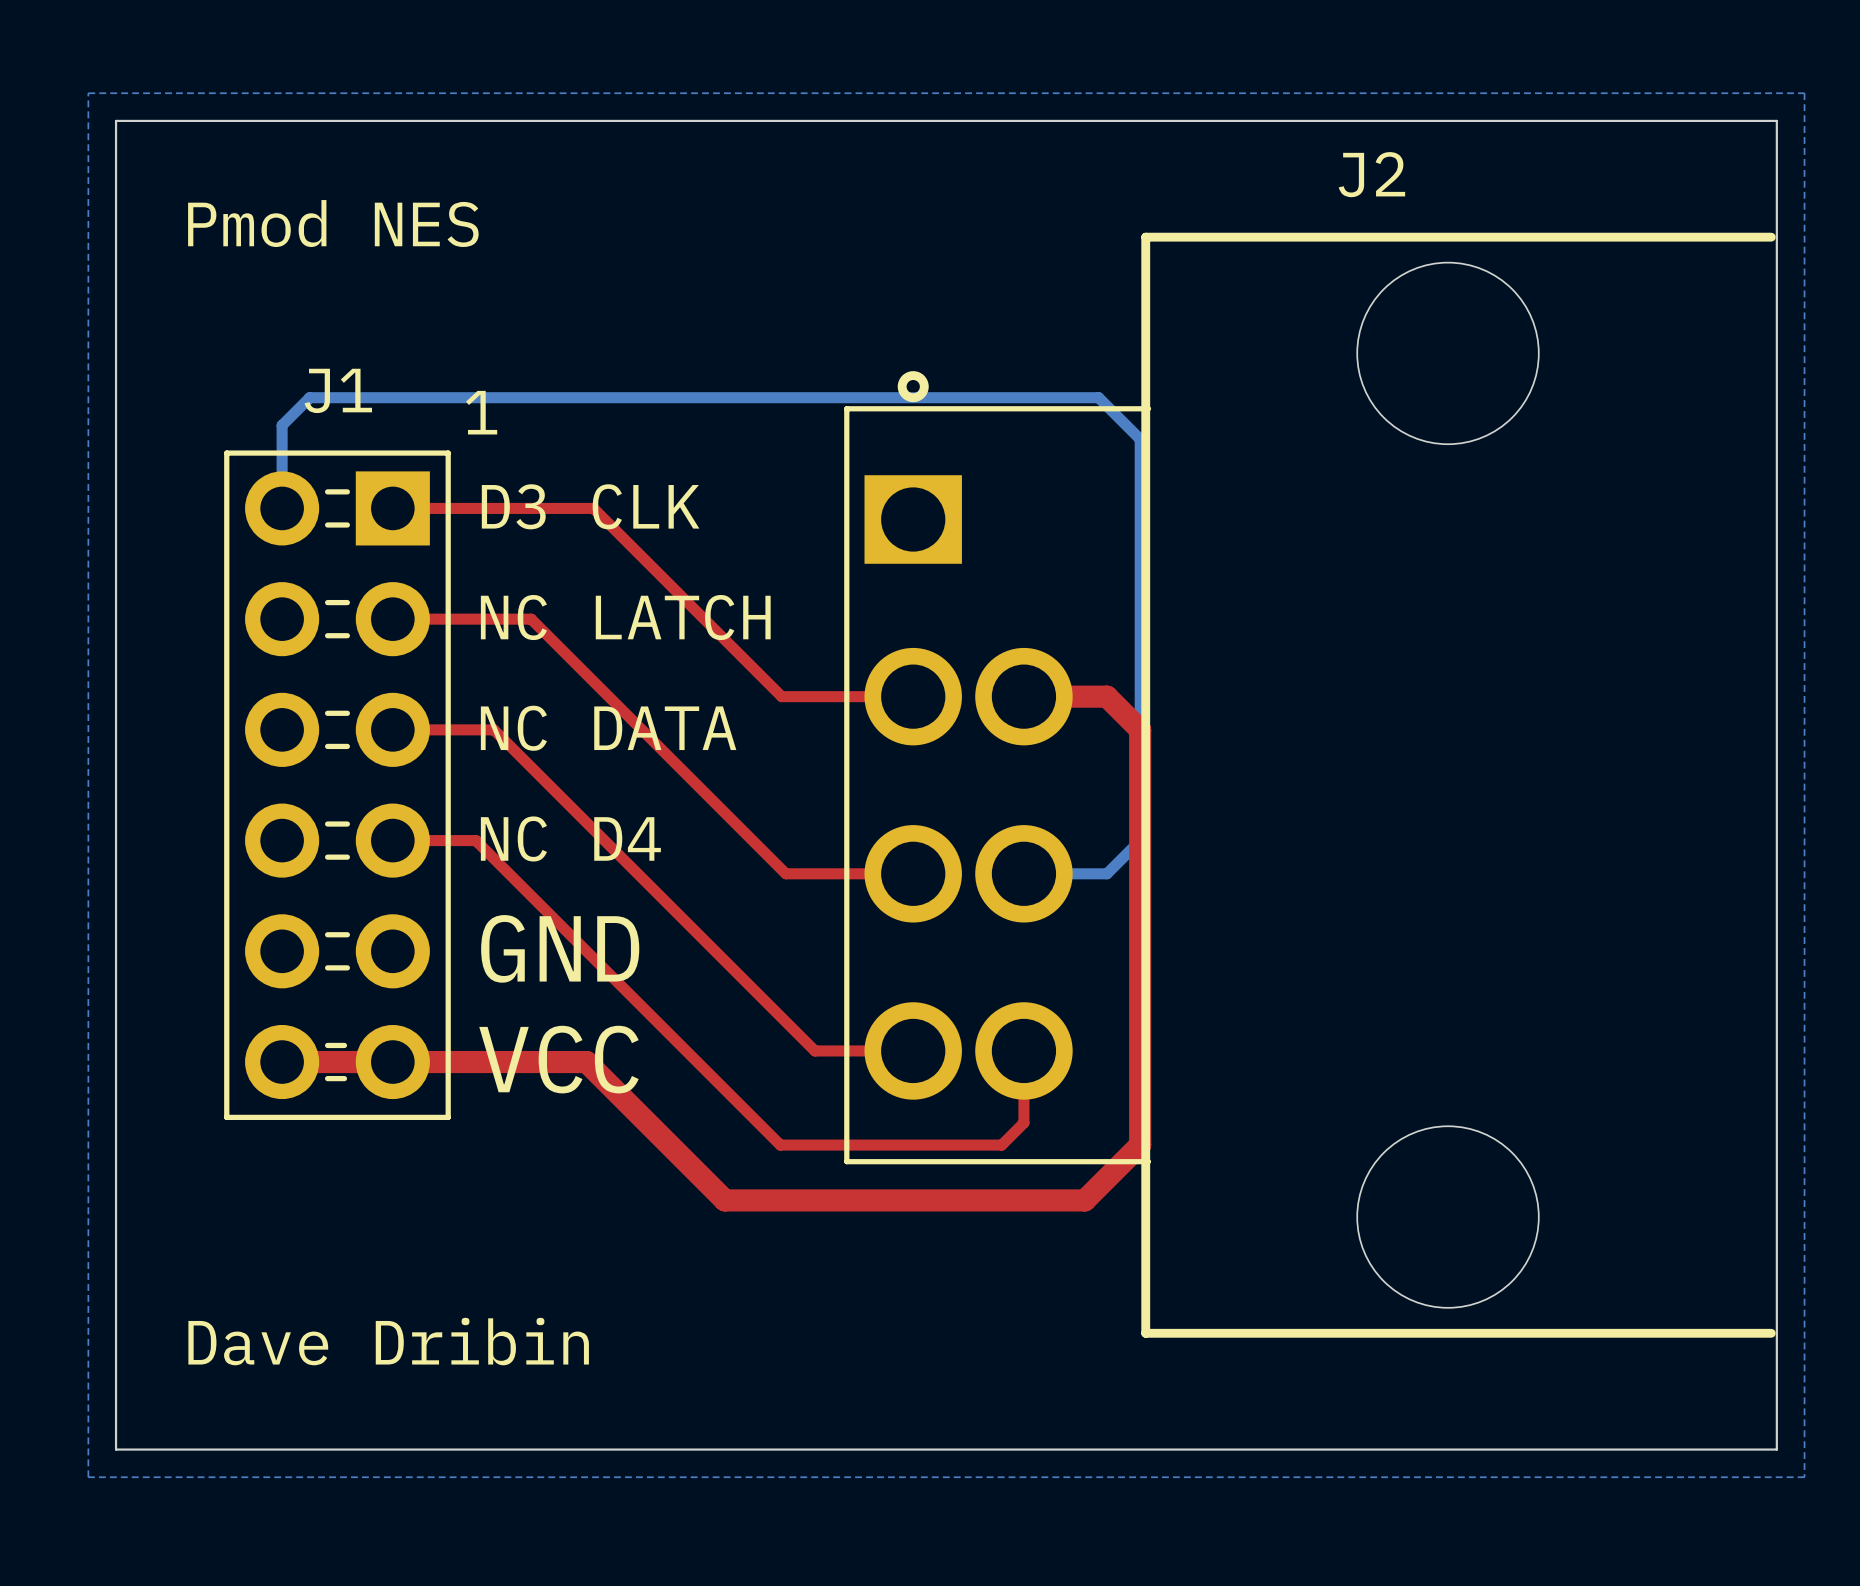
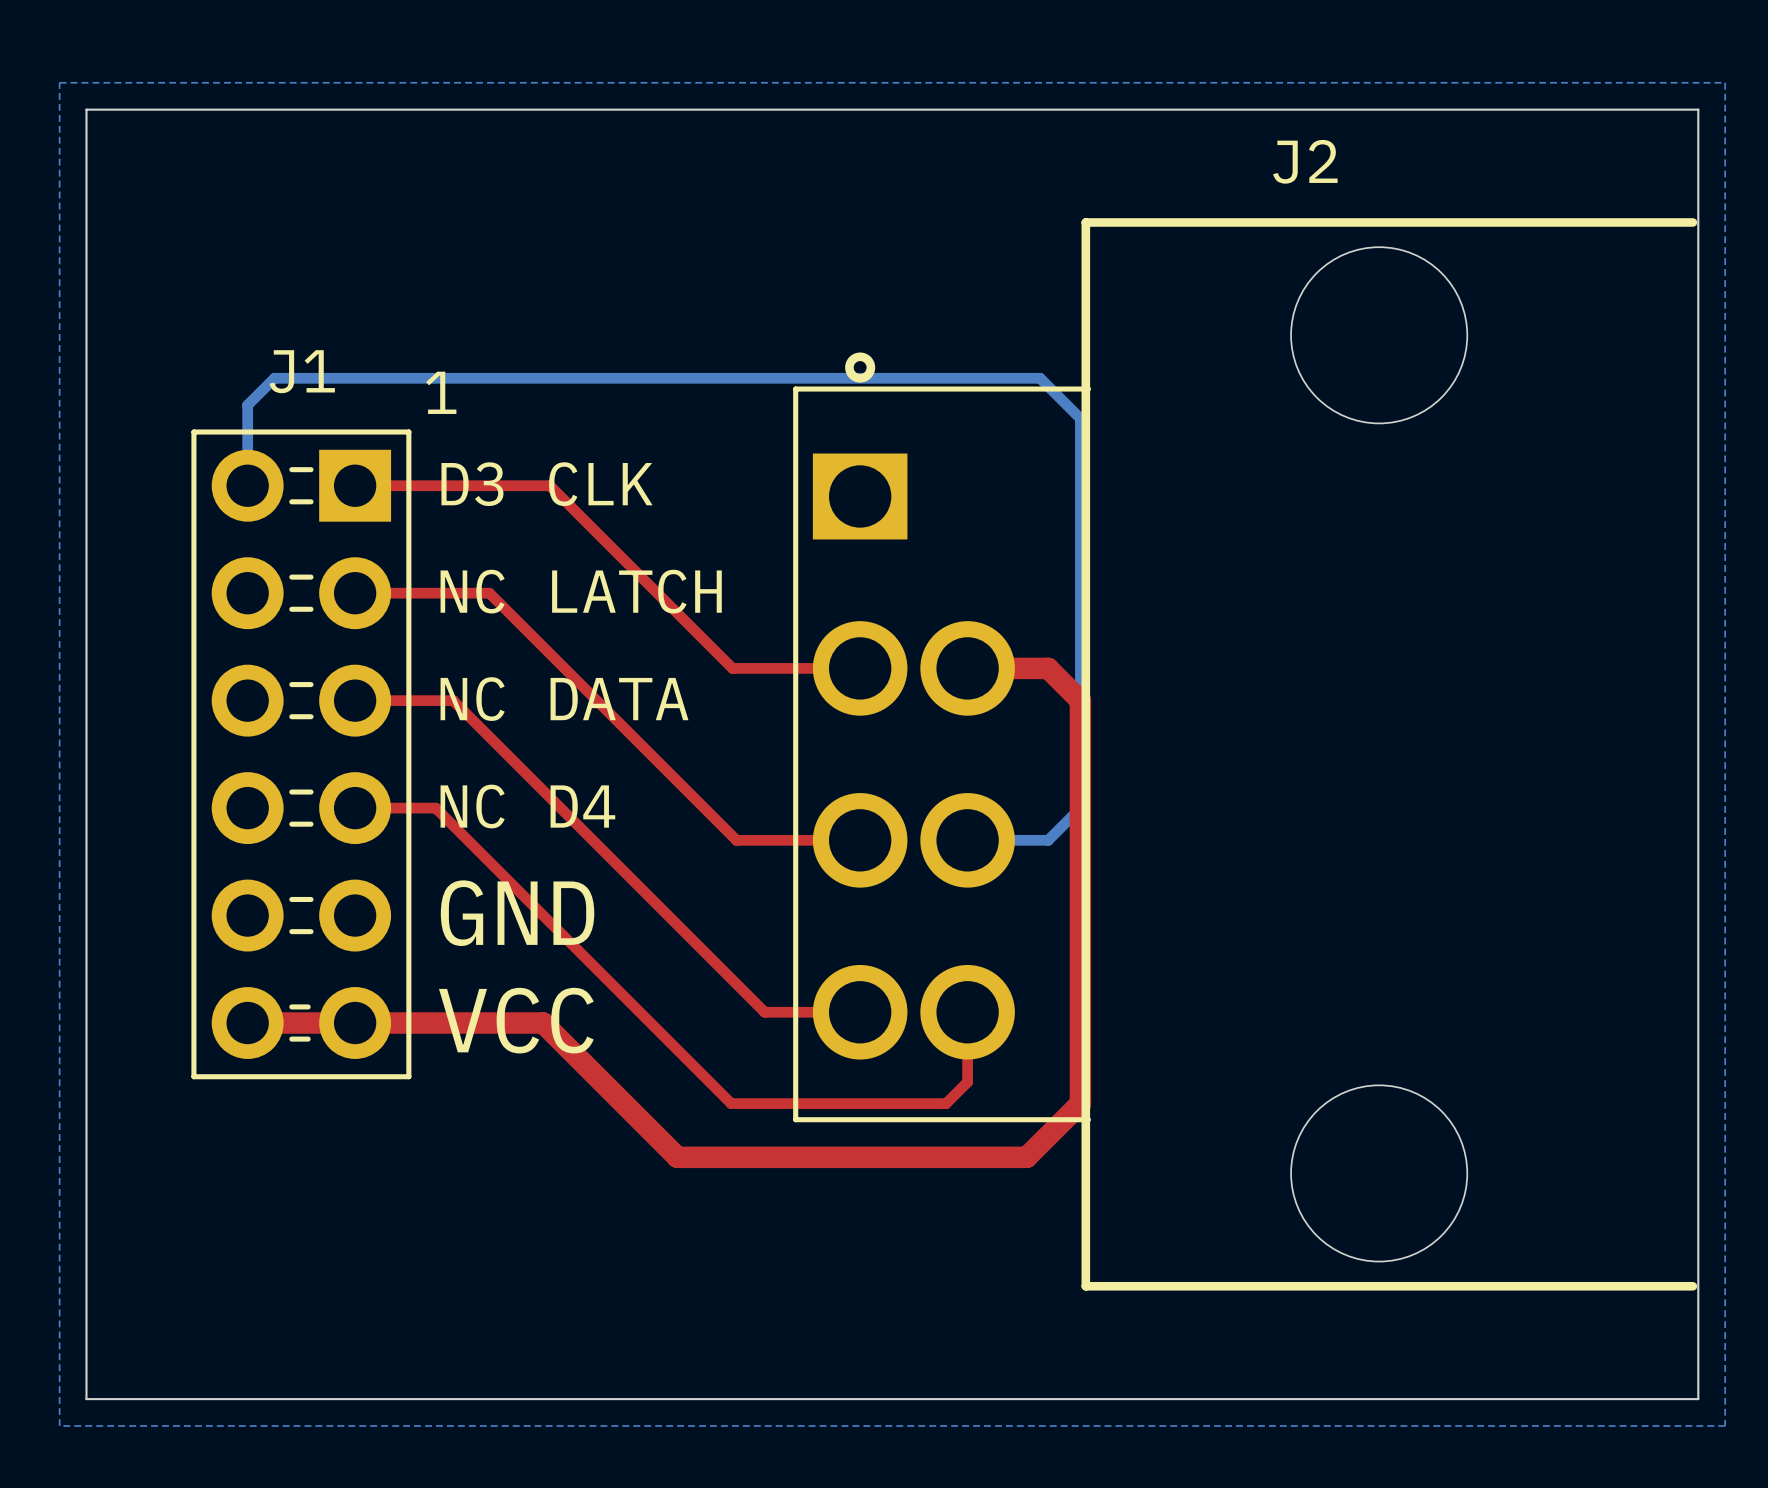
text: Pmod NES (333, 223) -> none
text: Dave Dribin (388, 1341) -> none

